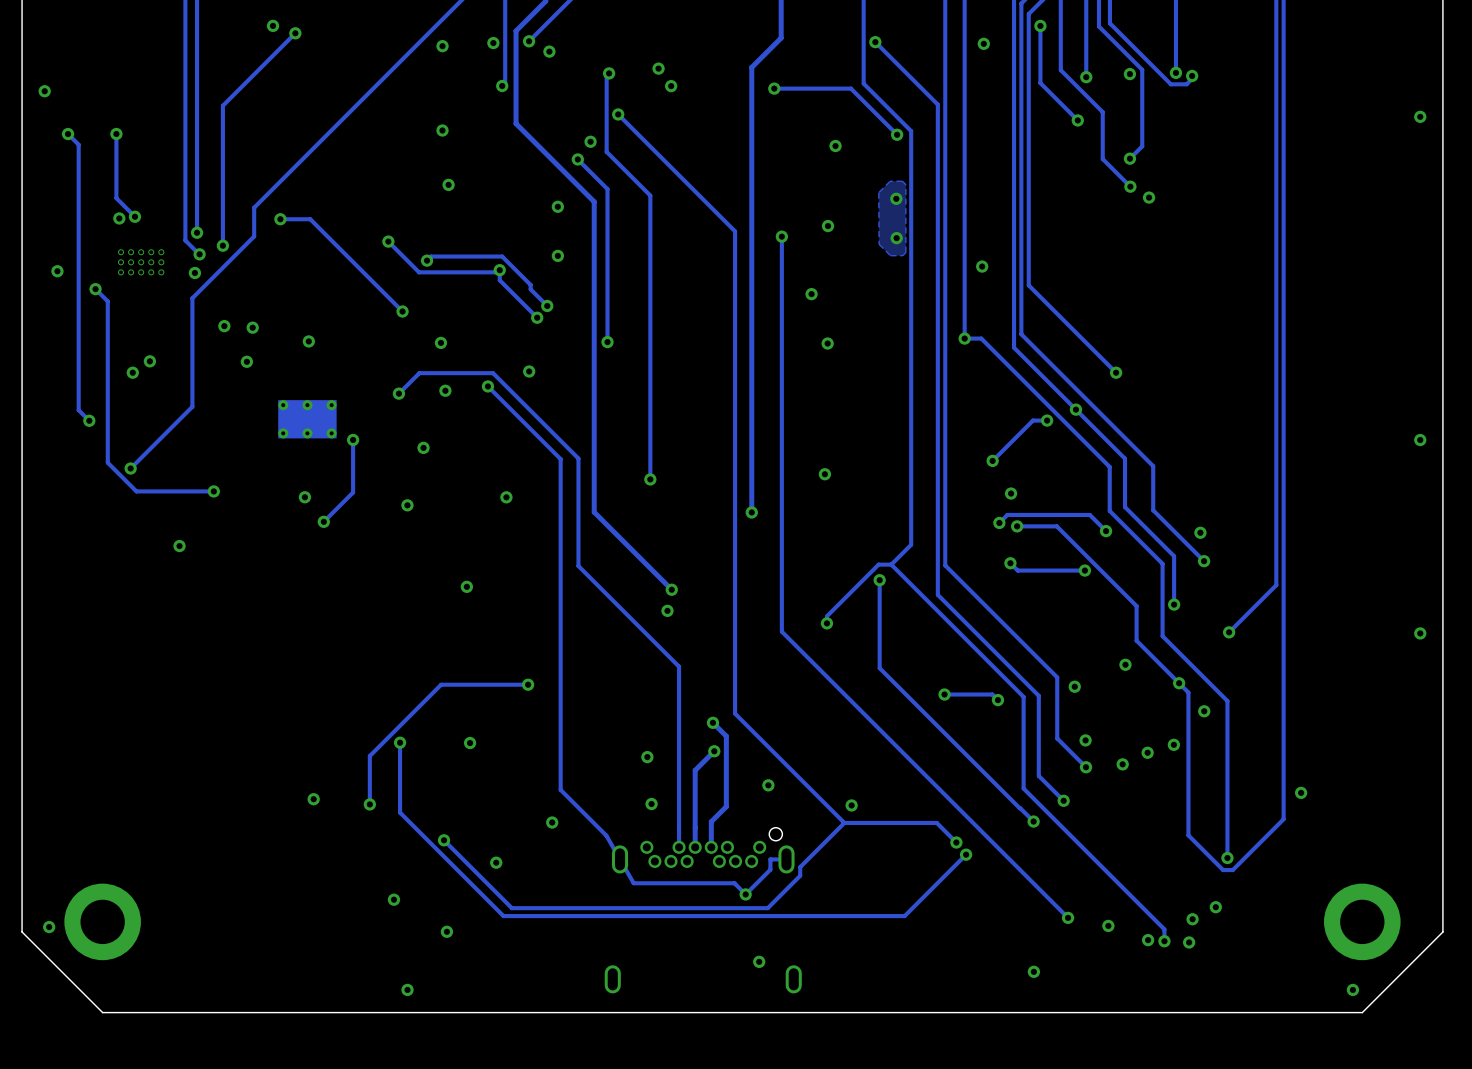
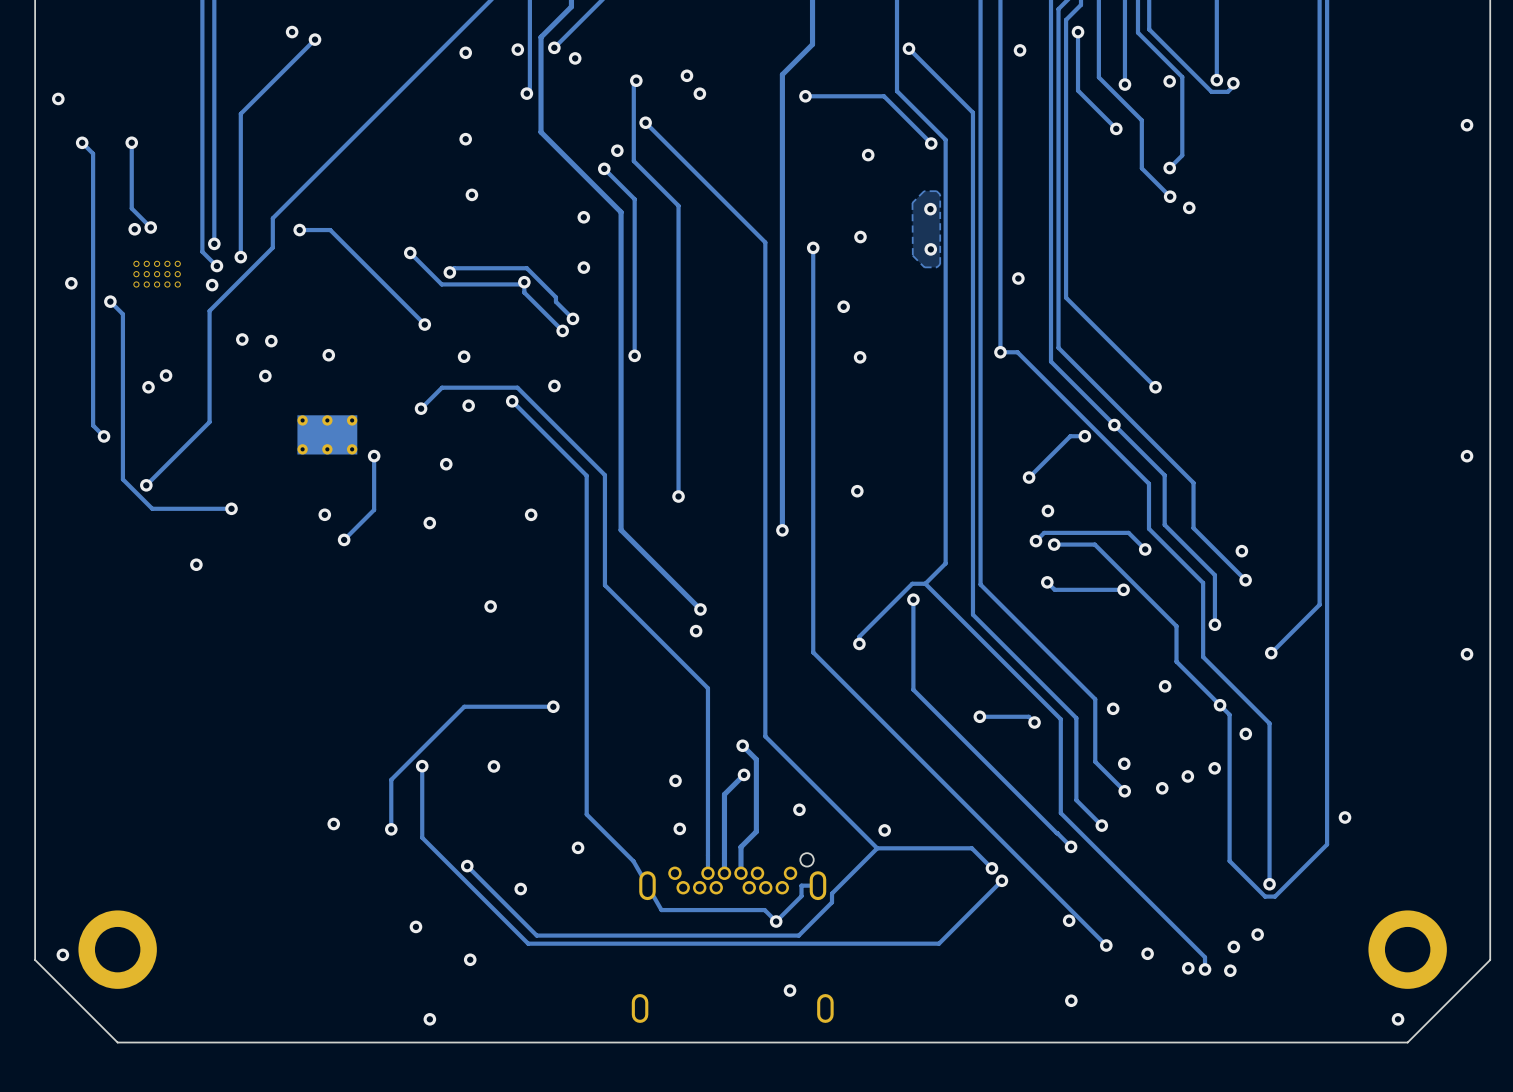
via: none -> (1069, 920)

